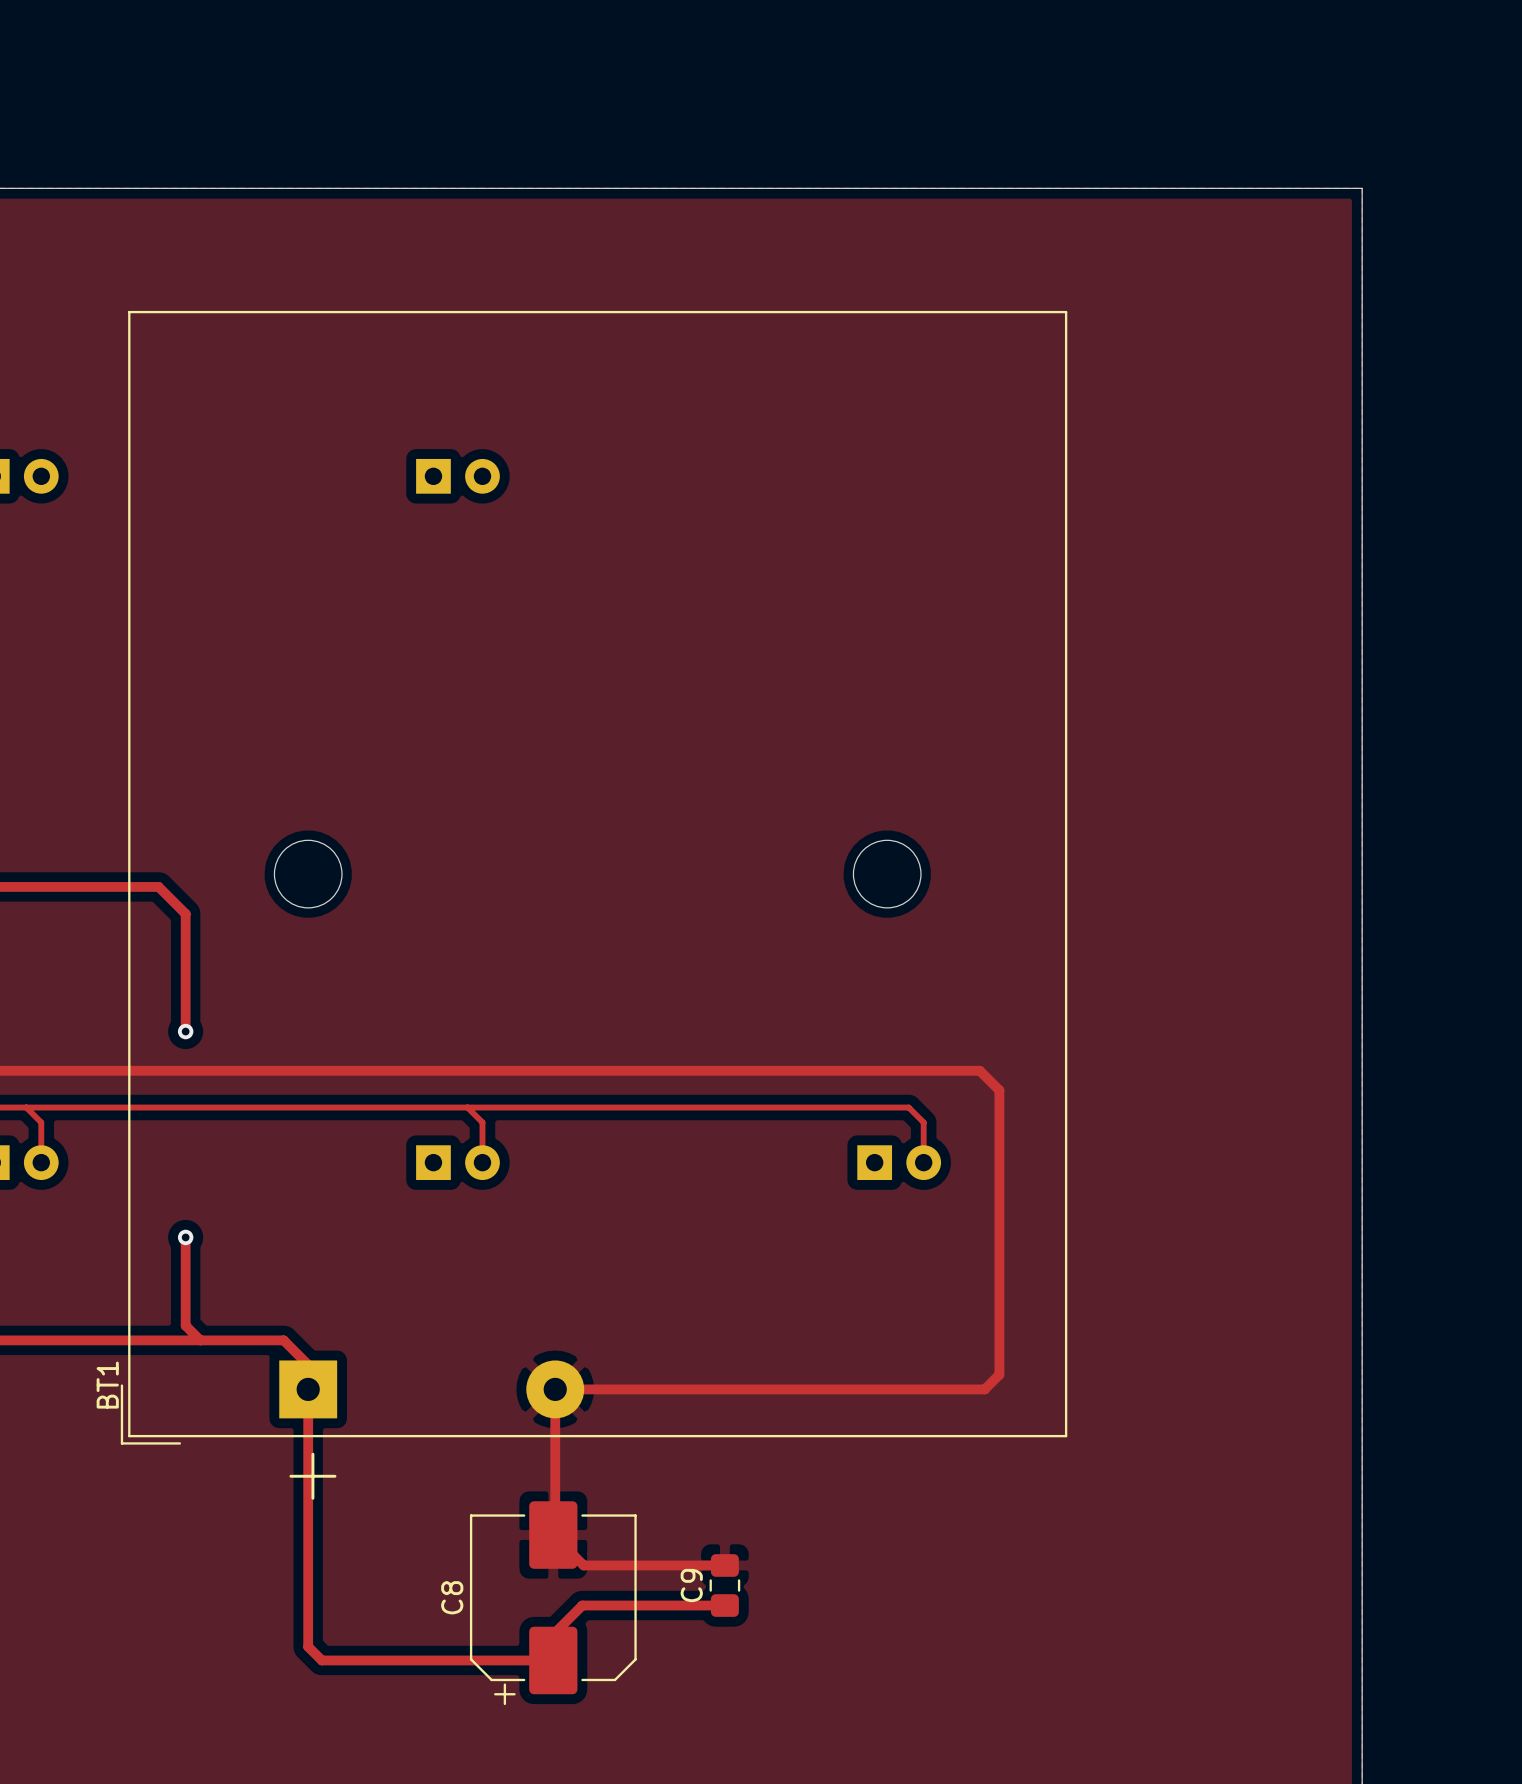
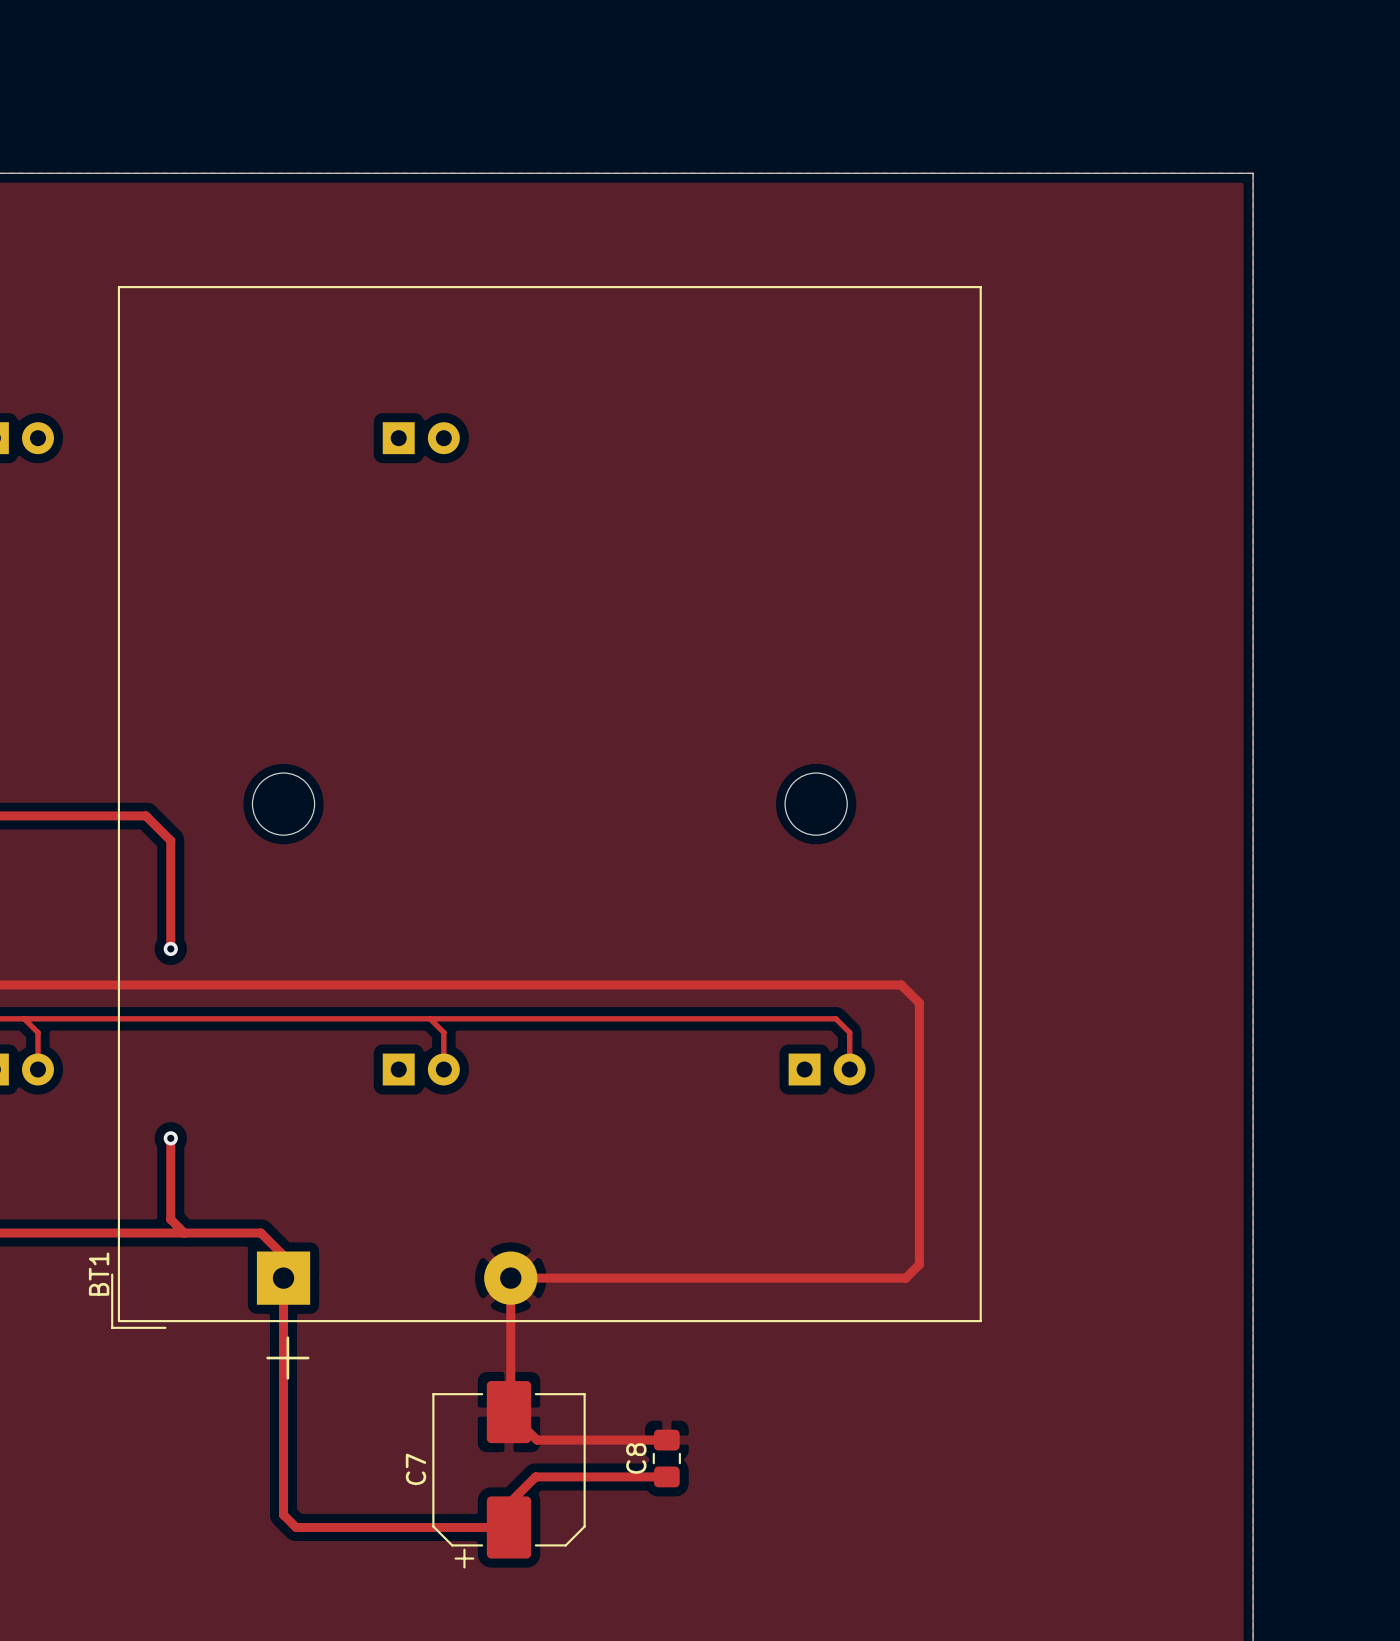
C9 name: C9 (691, 1585) -> C8 (636, 1458)
C8 name: C8 (452, 1597) -> C7 (416, 1469)

